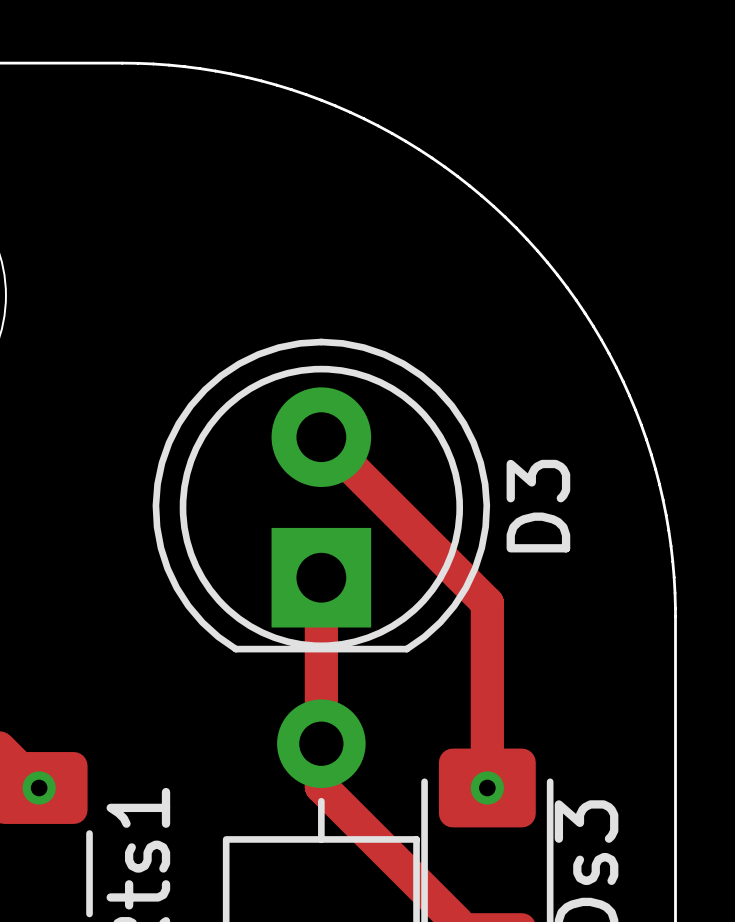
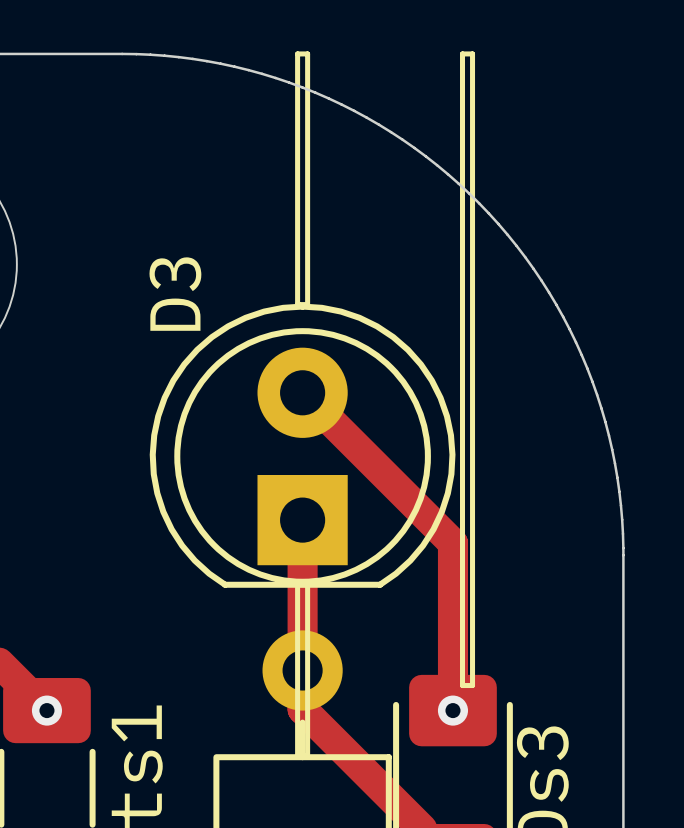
line: none -> (297, 53) (307, 53) (307, 304) (297, 304) (297, 53)
line: none -> (462, 53) (472, 53) (472, 685) (462, 685) (462, 53)
D3 name position: D3 (538, 506) -> D3 (175, 294)
line: none -> (297, 584) (297, 755) (307, 755) (307, 584) (297, 584)

